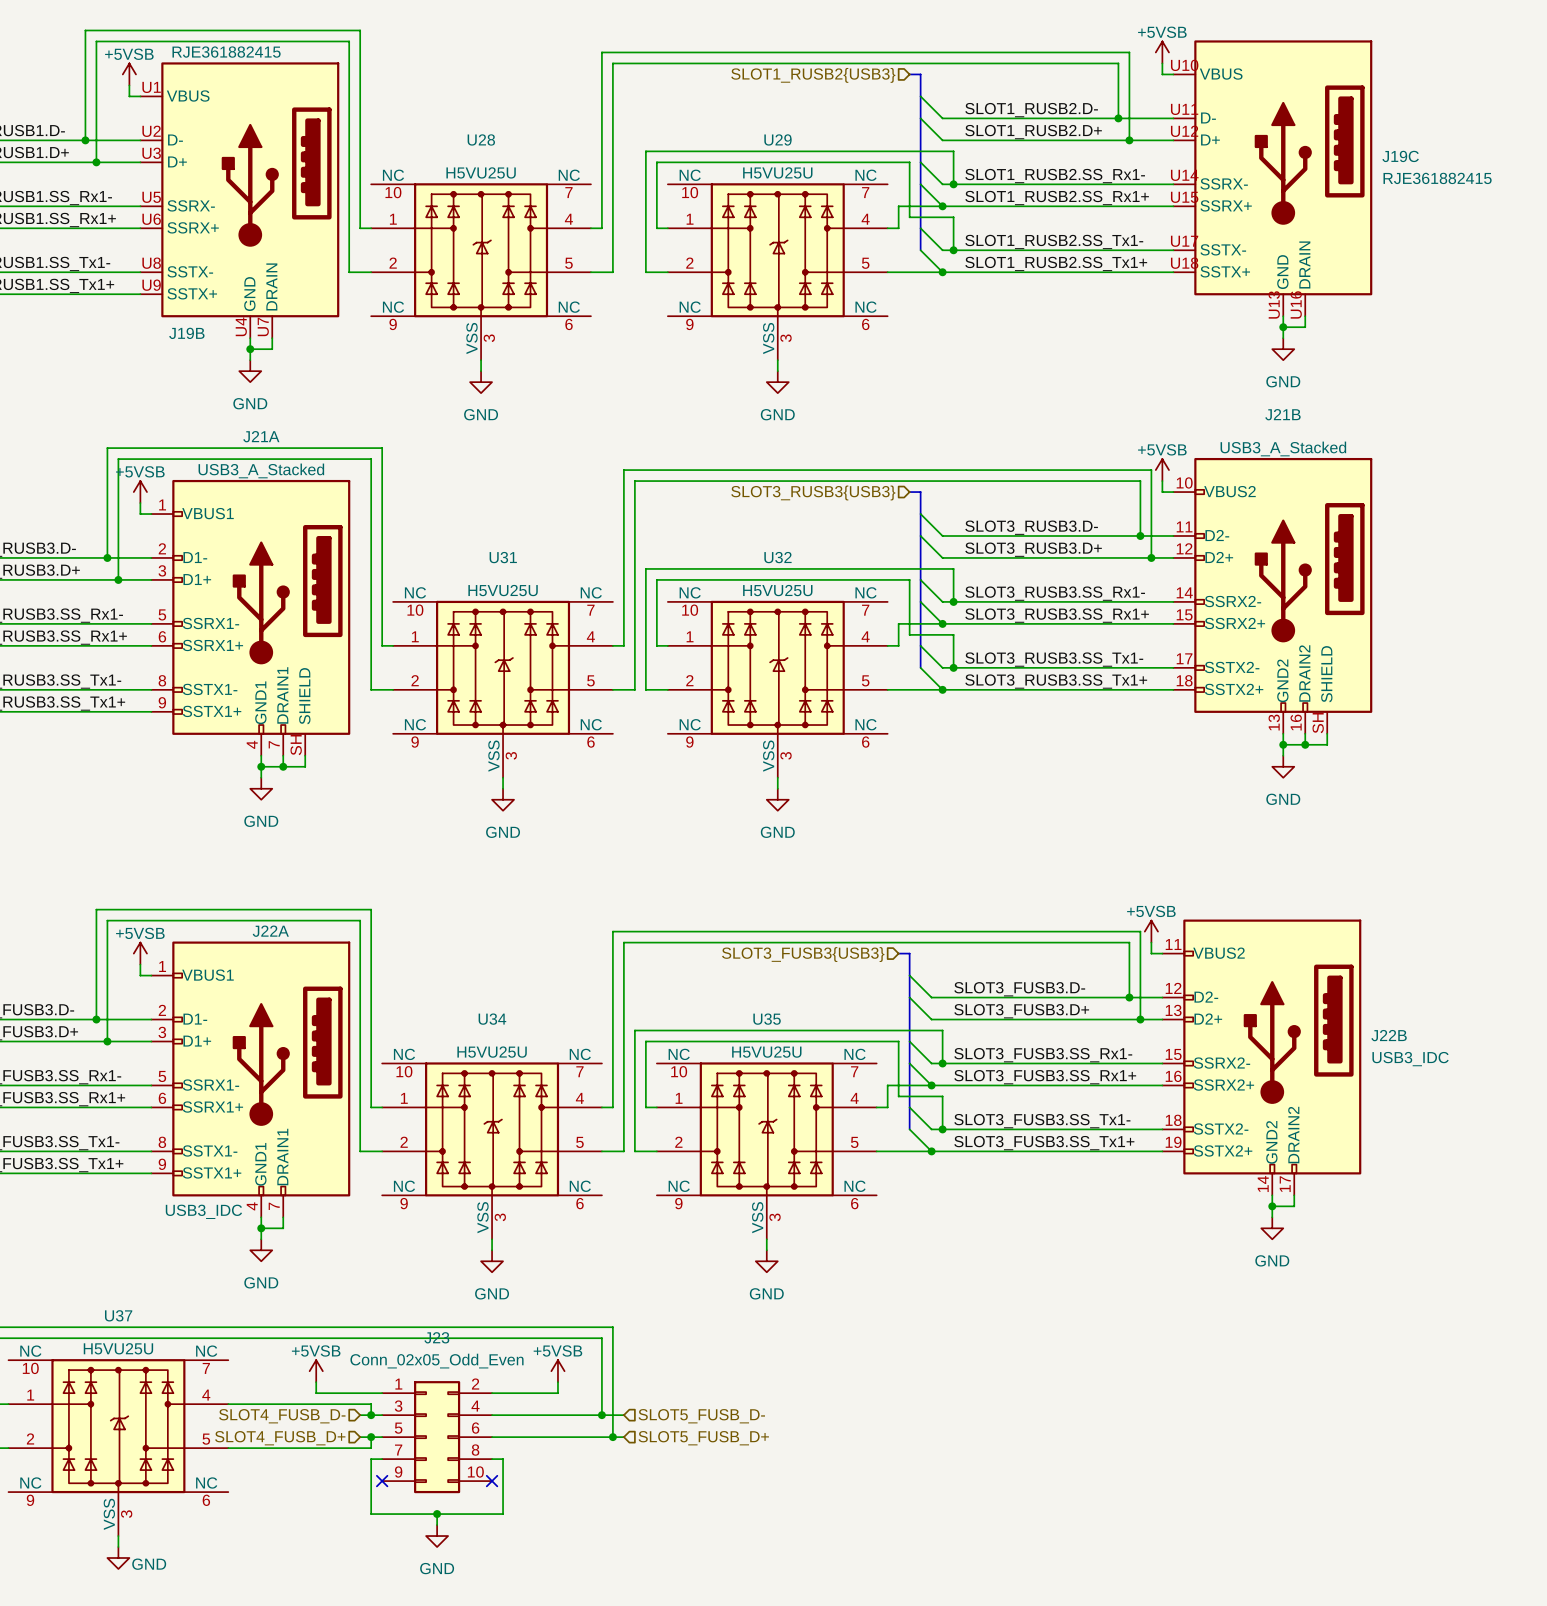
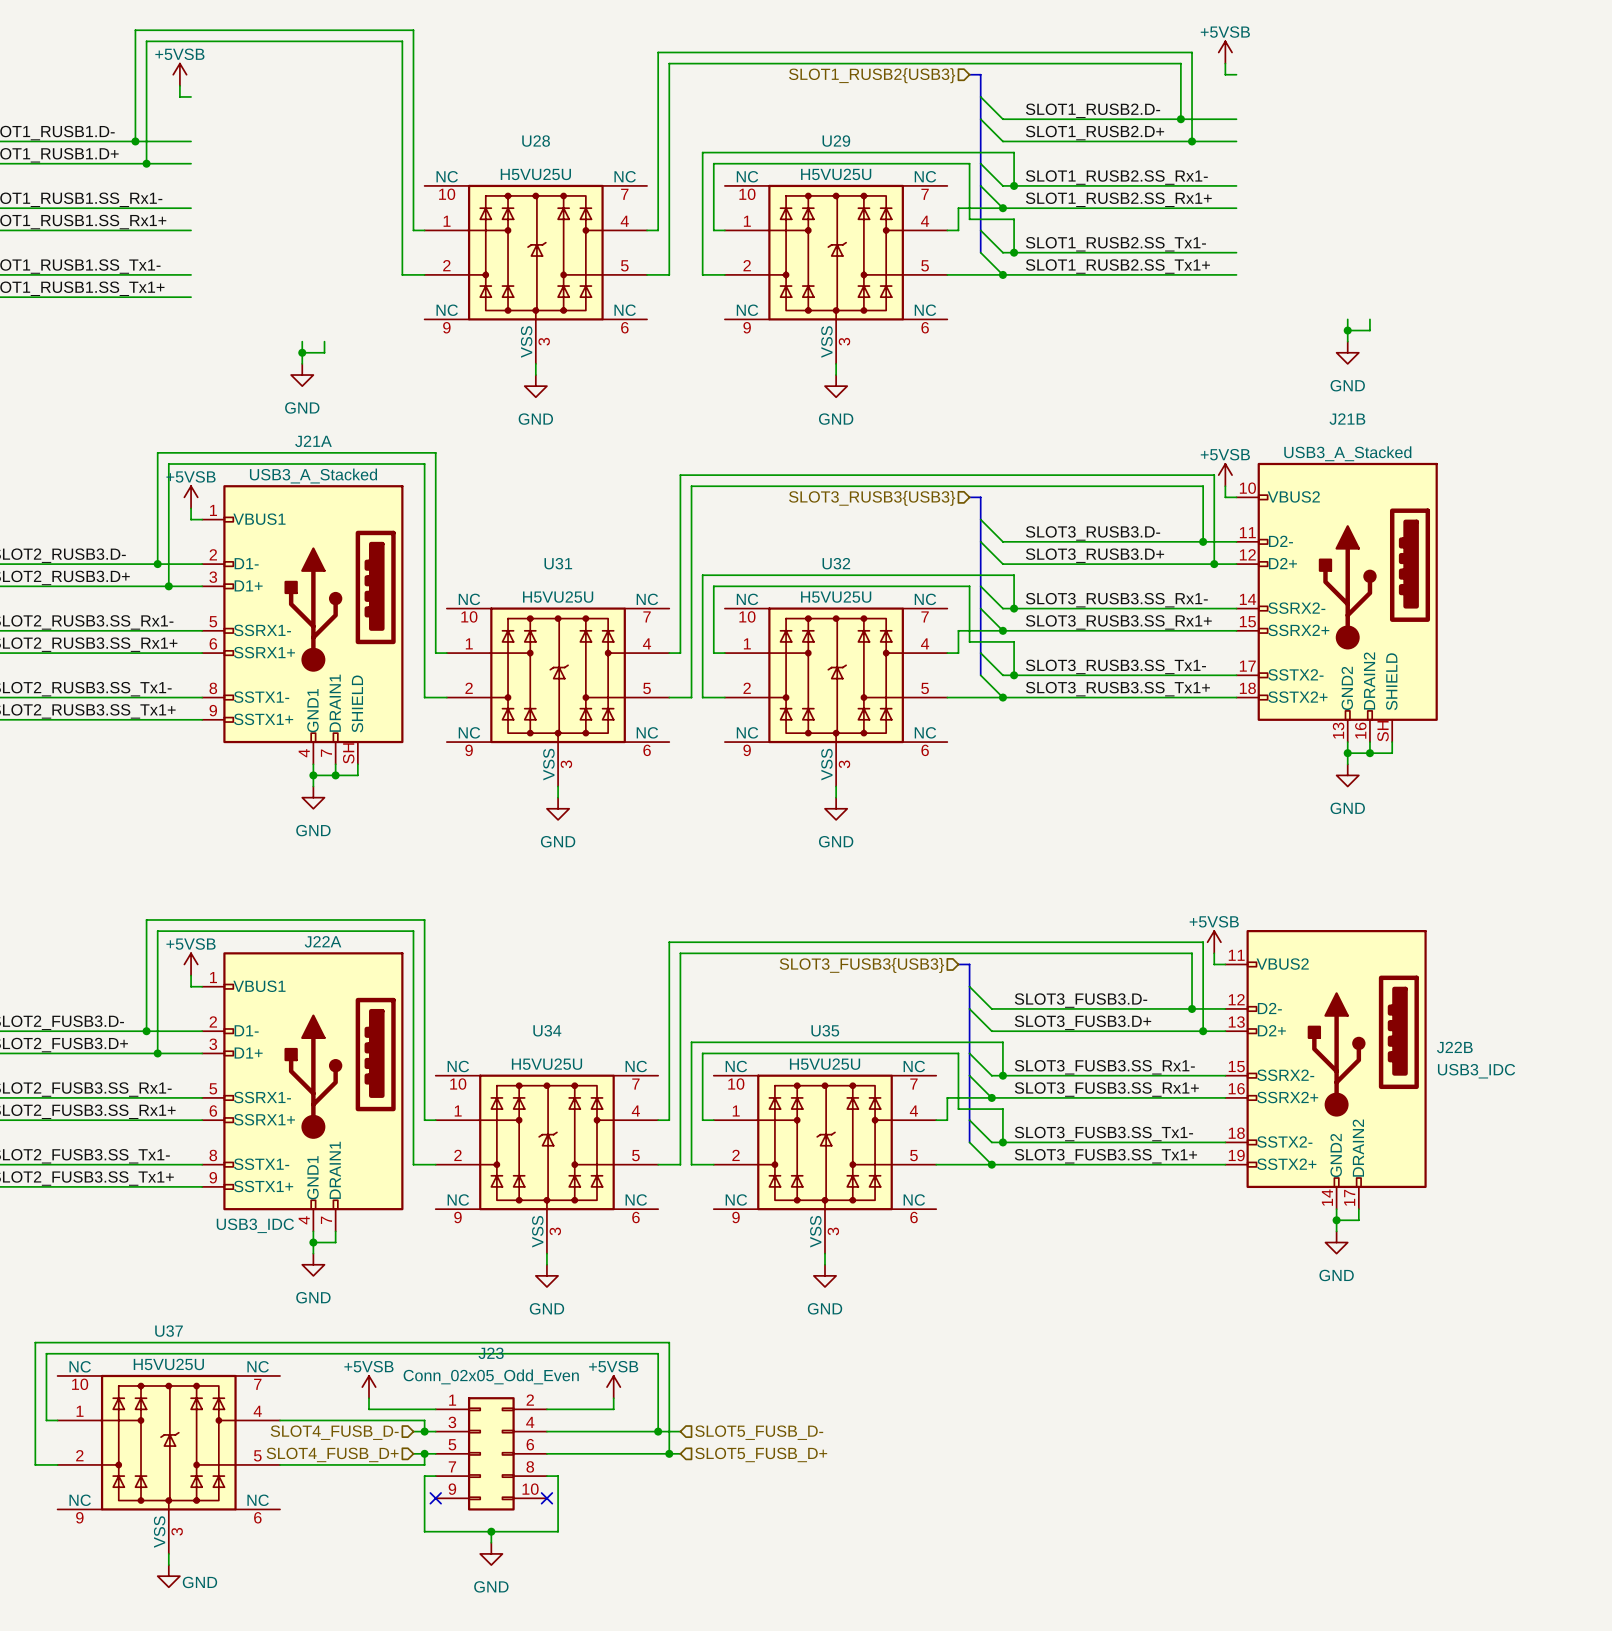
J19C: RJE361882415 (1272, 178) -> none
J19B: RJE361882415 (239, 200) -> none

